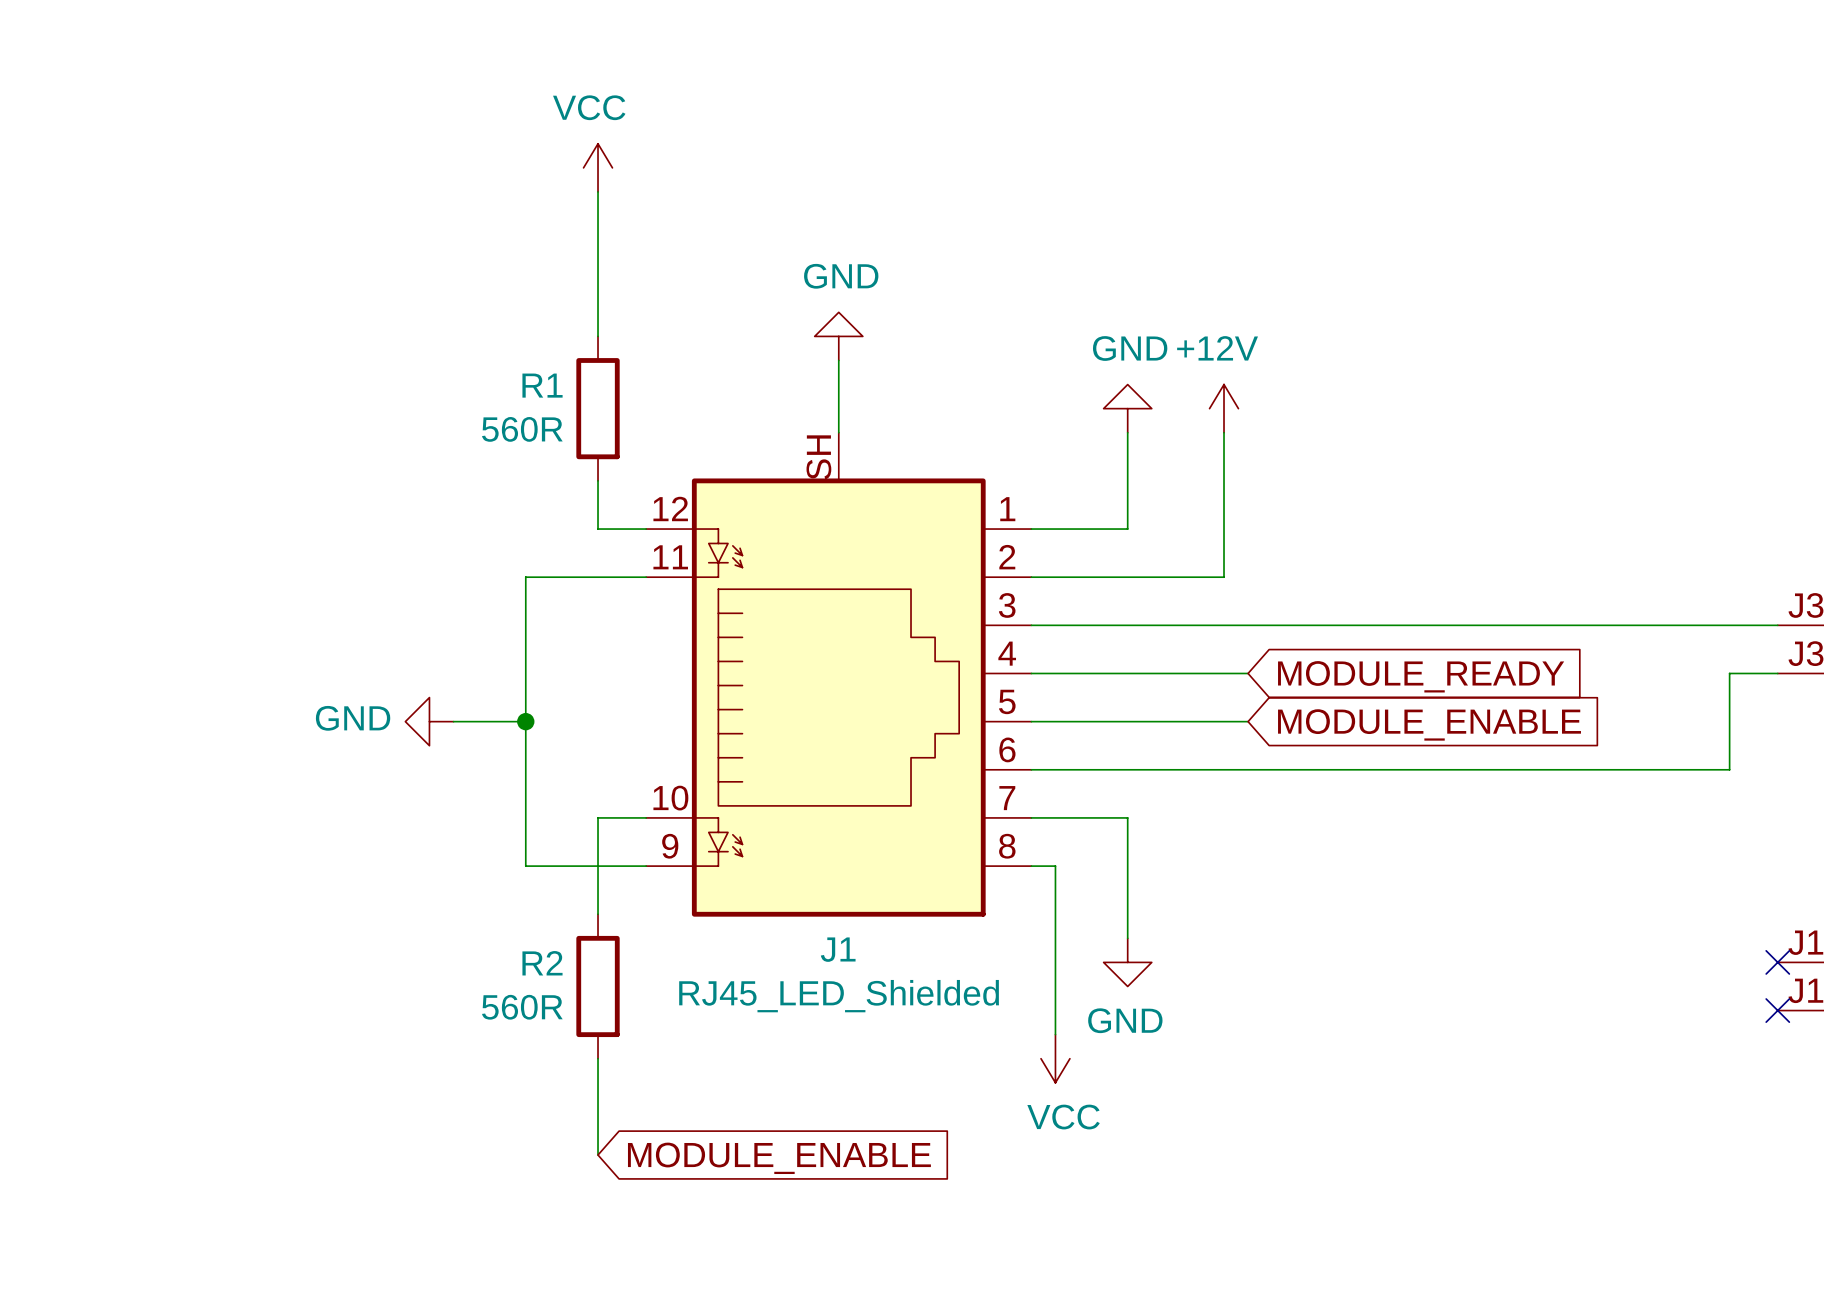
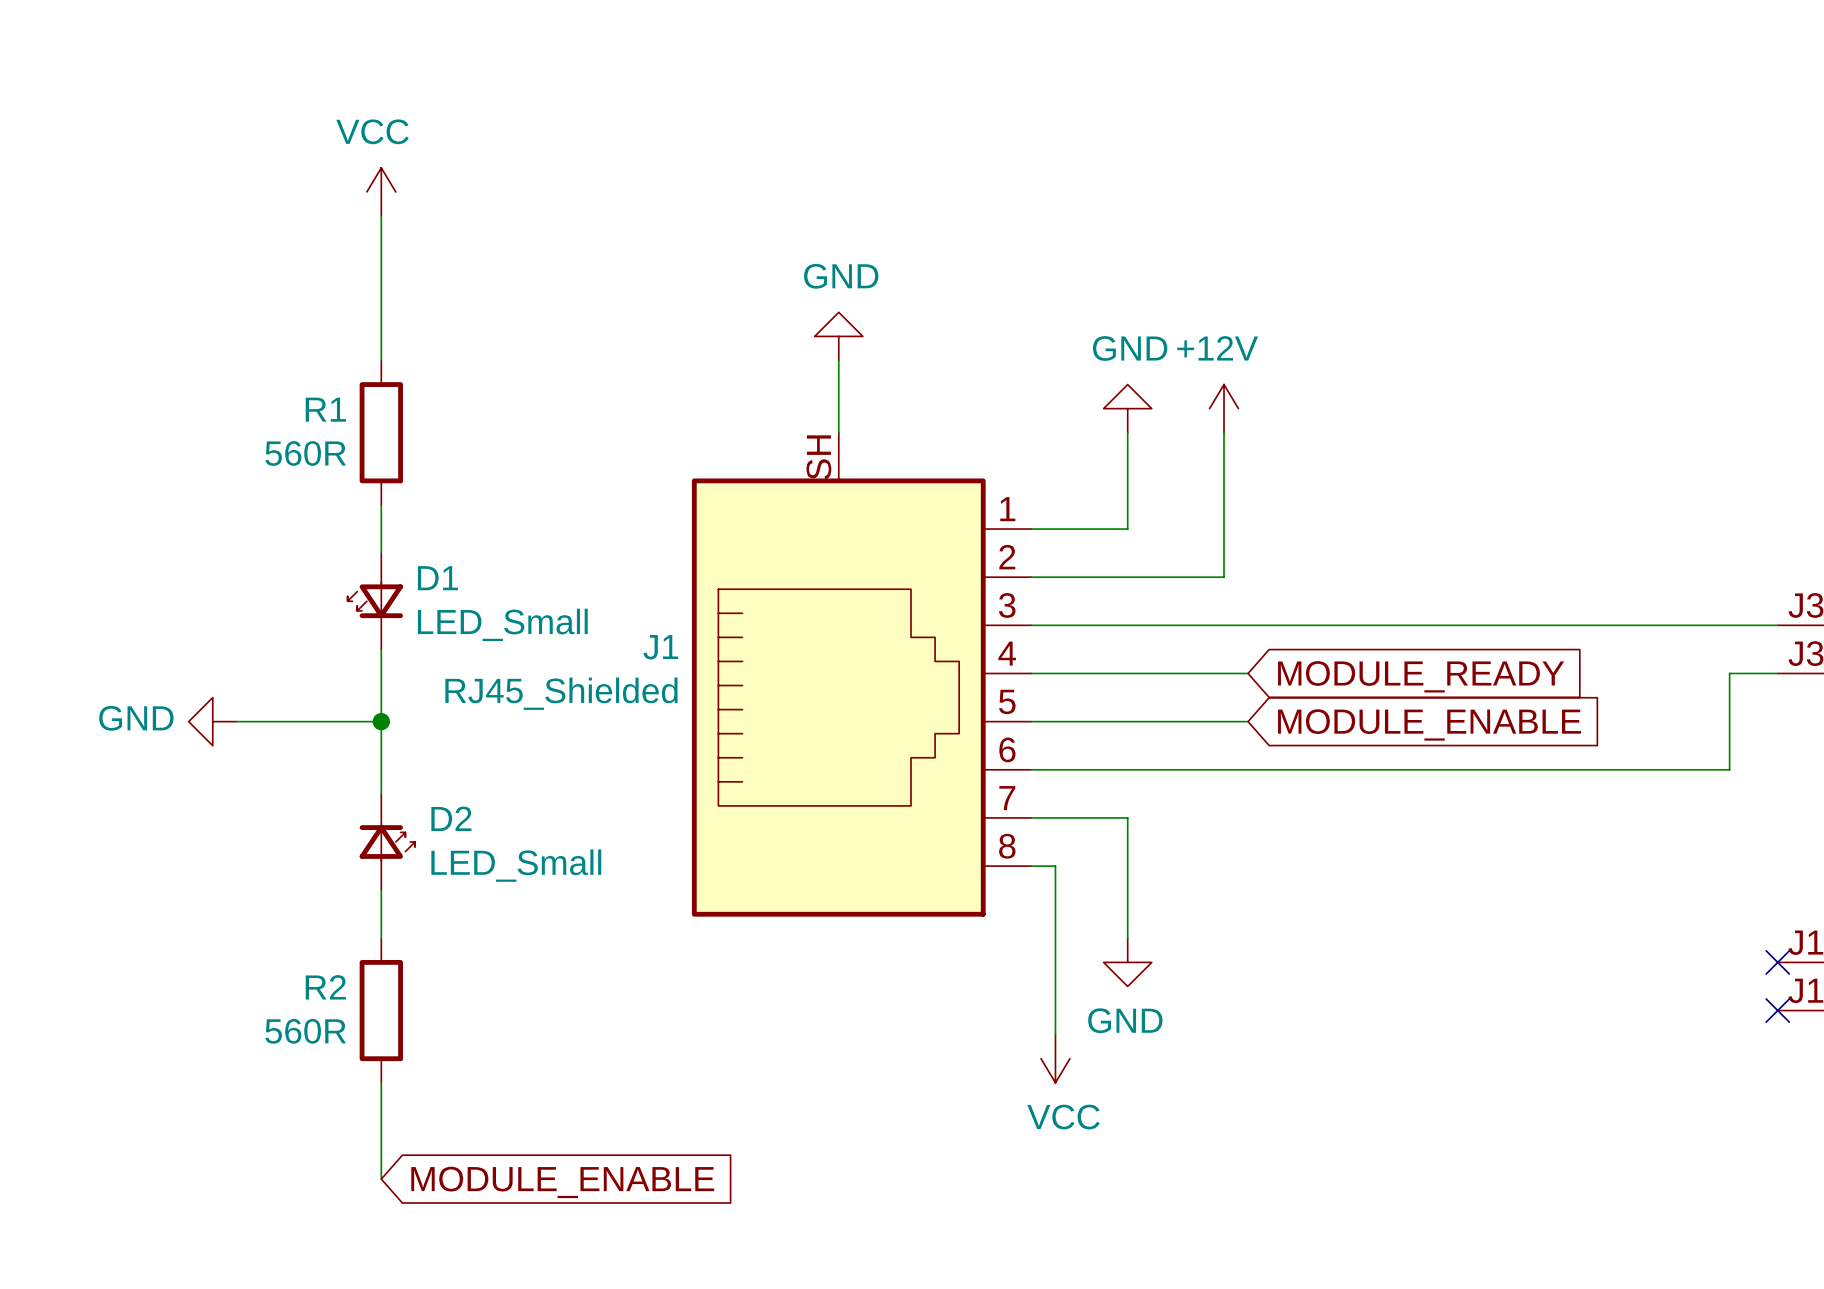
power symbol position: VCC (598, 167) -> VCC (381, 191)
wire: (598, 191) (598, 336) -> (381, 216) (381, 360)
R1 position: (598, 408) -> (381, 432)
J1 symbol: [646, 432, 1032, 917] -> [691, 432, 1032, 917]
wire: (598, 480) (598, 529) (646, 529) -> none
wire: none -> (381, 504) (381, 553)
wire: (646, 577) (525, 577) (525, 866) (646, 866) -> none
D1: none -> LED_Small (375, 601)
wire: none -> (381, 649) (381, 793)
wire: none -> (236, 721) (381, 721)
junction: none -> (381, 721)
power symbol position: GND (429, 721) -> GND (212, 721)
wire: (453, 721) (525, 721) -> none
junction: (525, 721) -> none
wire: (646, 817) (598, 817) (598, 914) -> none
D2: none -> LED_Small (387, 842)
wire: none -> (381, 890) (381, 938)
J1 name position: J1 (838, 949) -> J1 (660, 647)
R2 position: (598, 986) -> (381, 1010)
J1 value: RJ45_LED_Shielded (839, 996) -> RJ45_Shielded (561, 693)
wire: (598, 1058) (598, 1155) -> (381, 1082) (381, 1179)
global label position: MODULE_ENABLE (779, 1158) -> MODULE_ENABLE (562, 1182)

